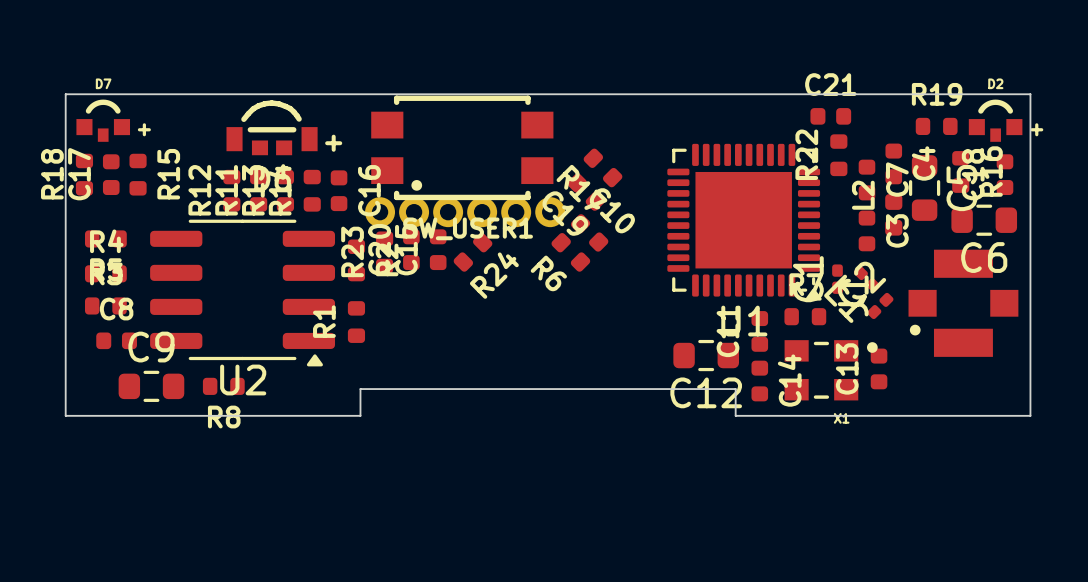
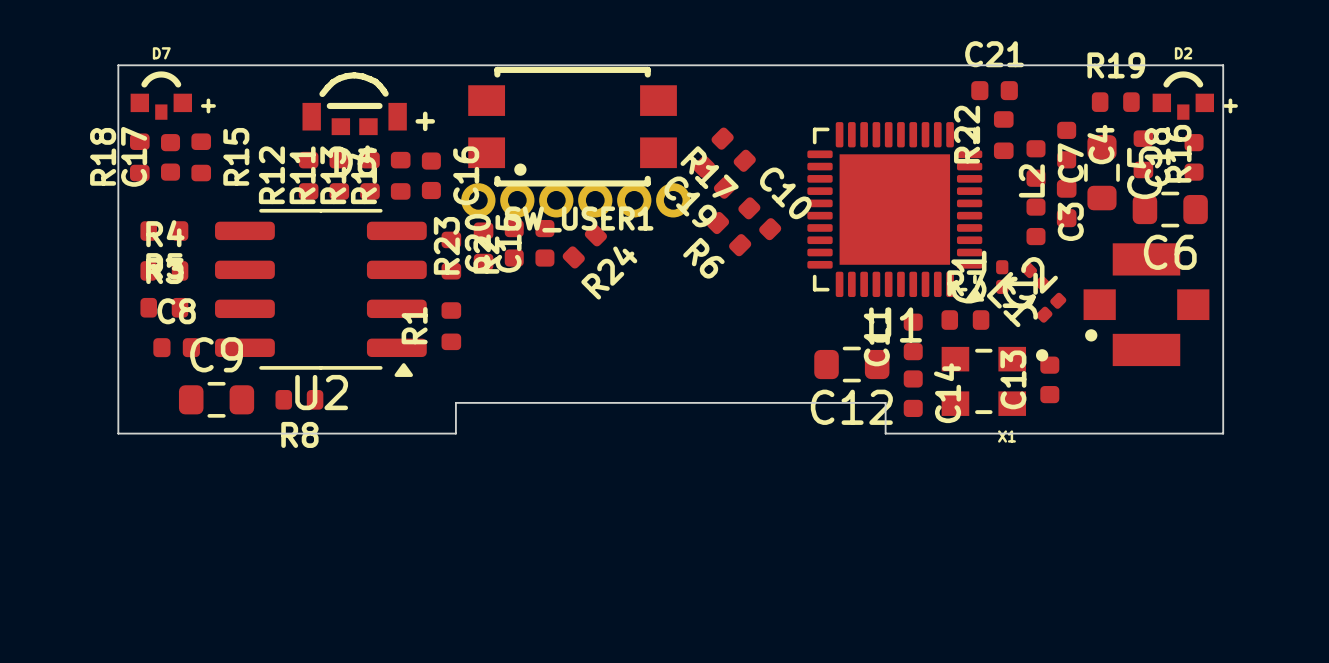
C10 position: (589, 232) -> (759, 218)
R6 position: (570, 252) -> (729, 234)

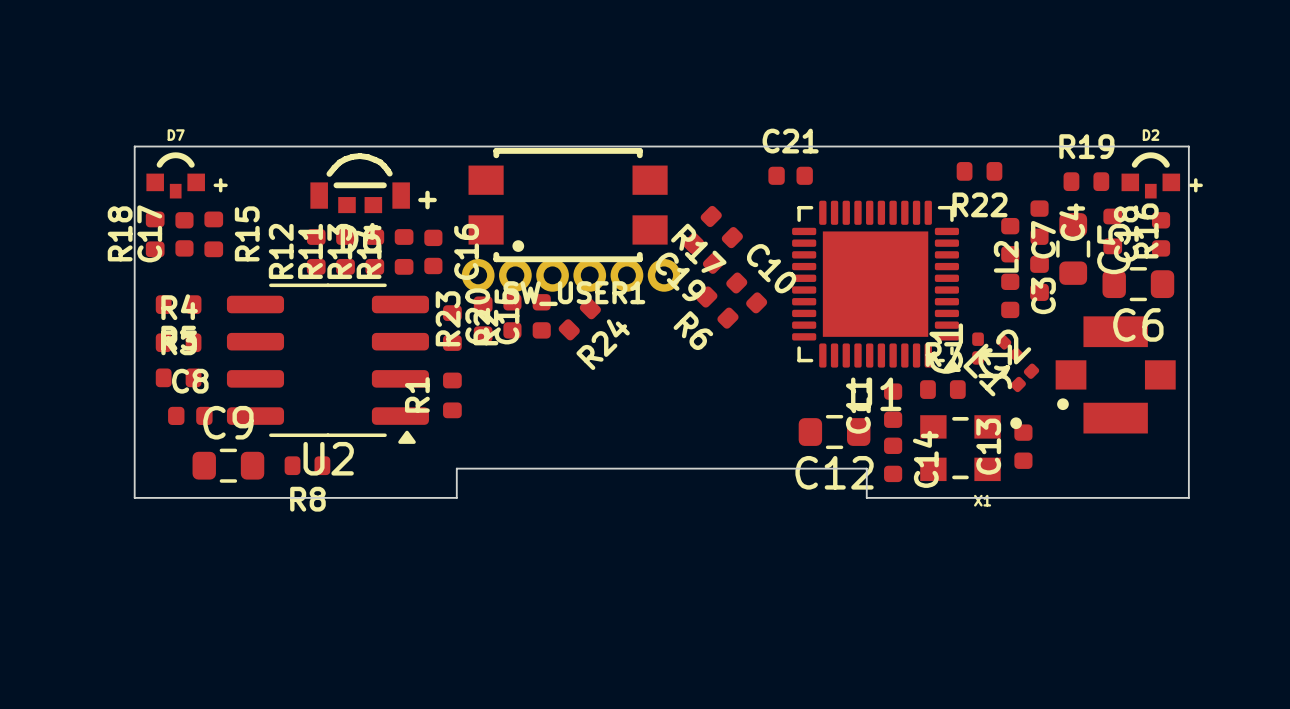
C21 position: (994, 90) -> (790, 175)
R22 rotation: 0° (1003, 135) -> 90° clockwise (979, 171)
R22 position: (1003, 135) -> (979, 171)

